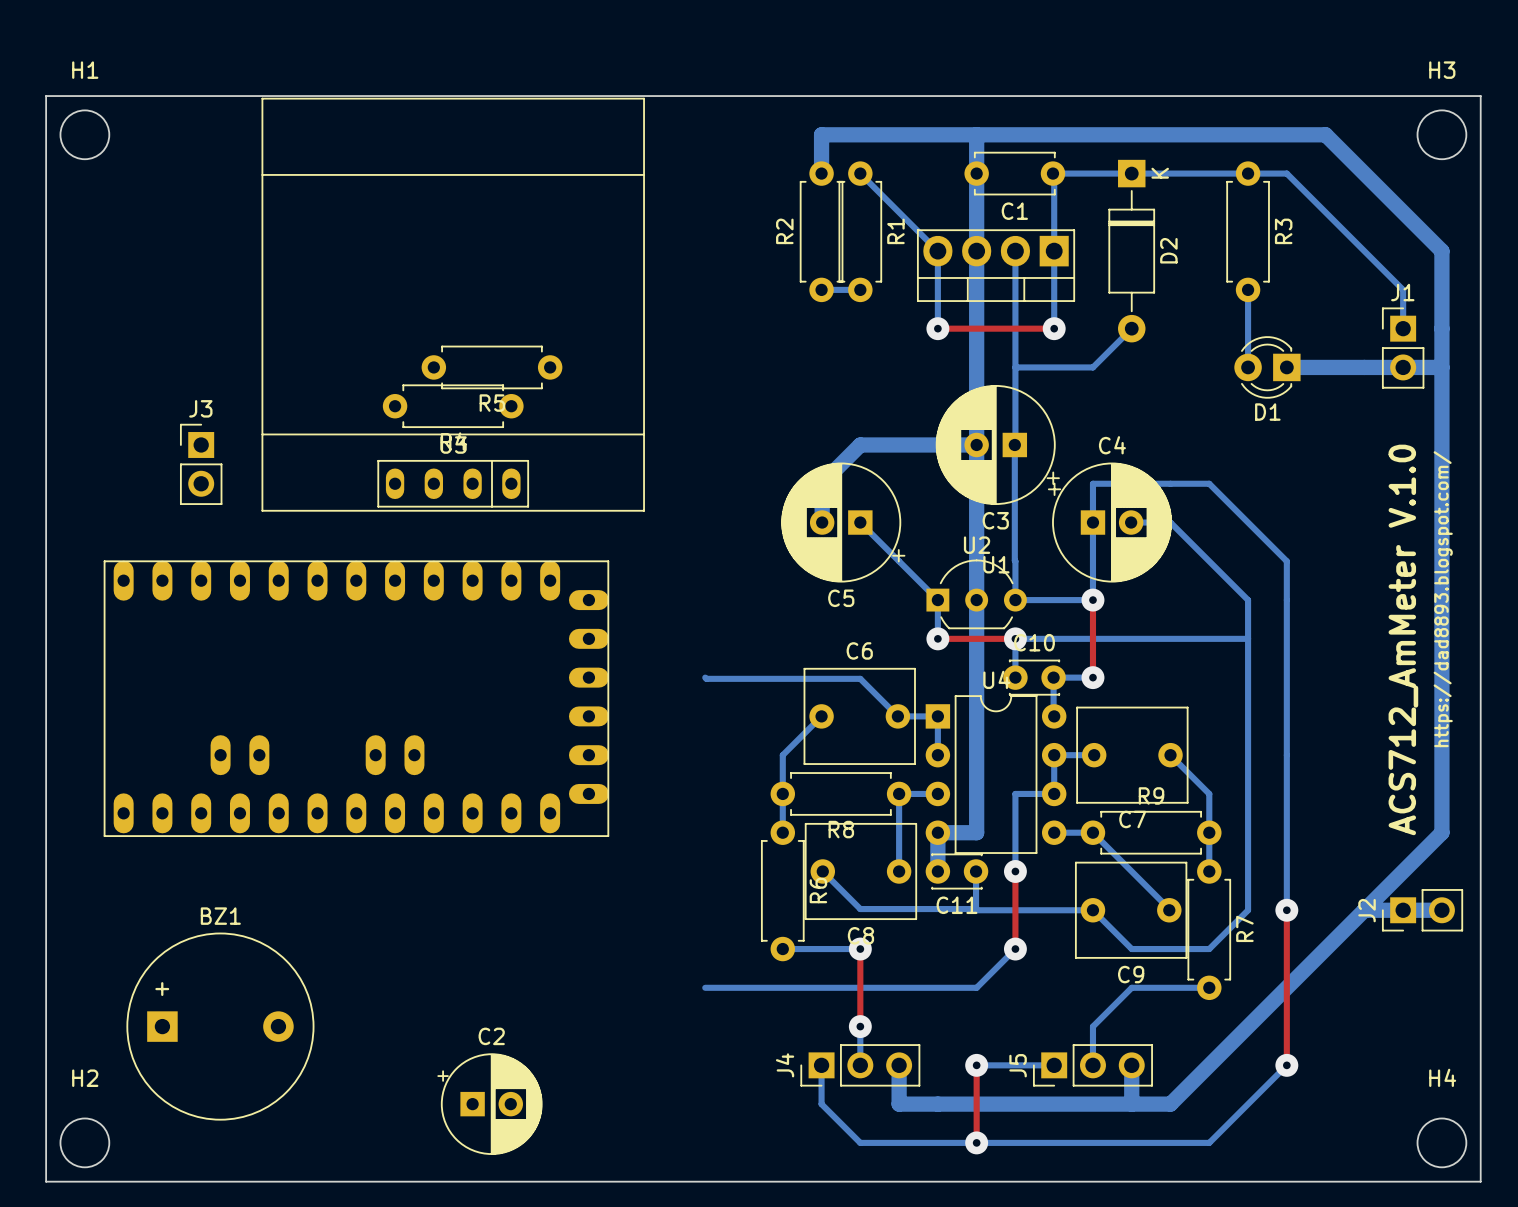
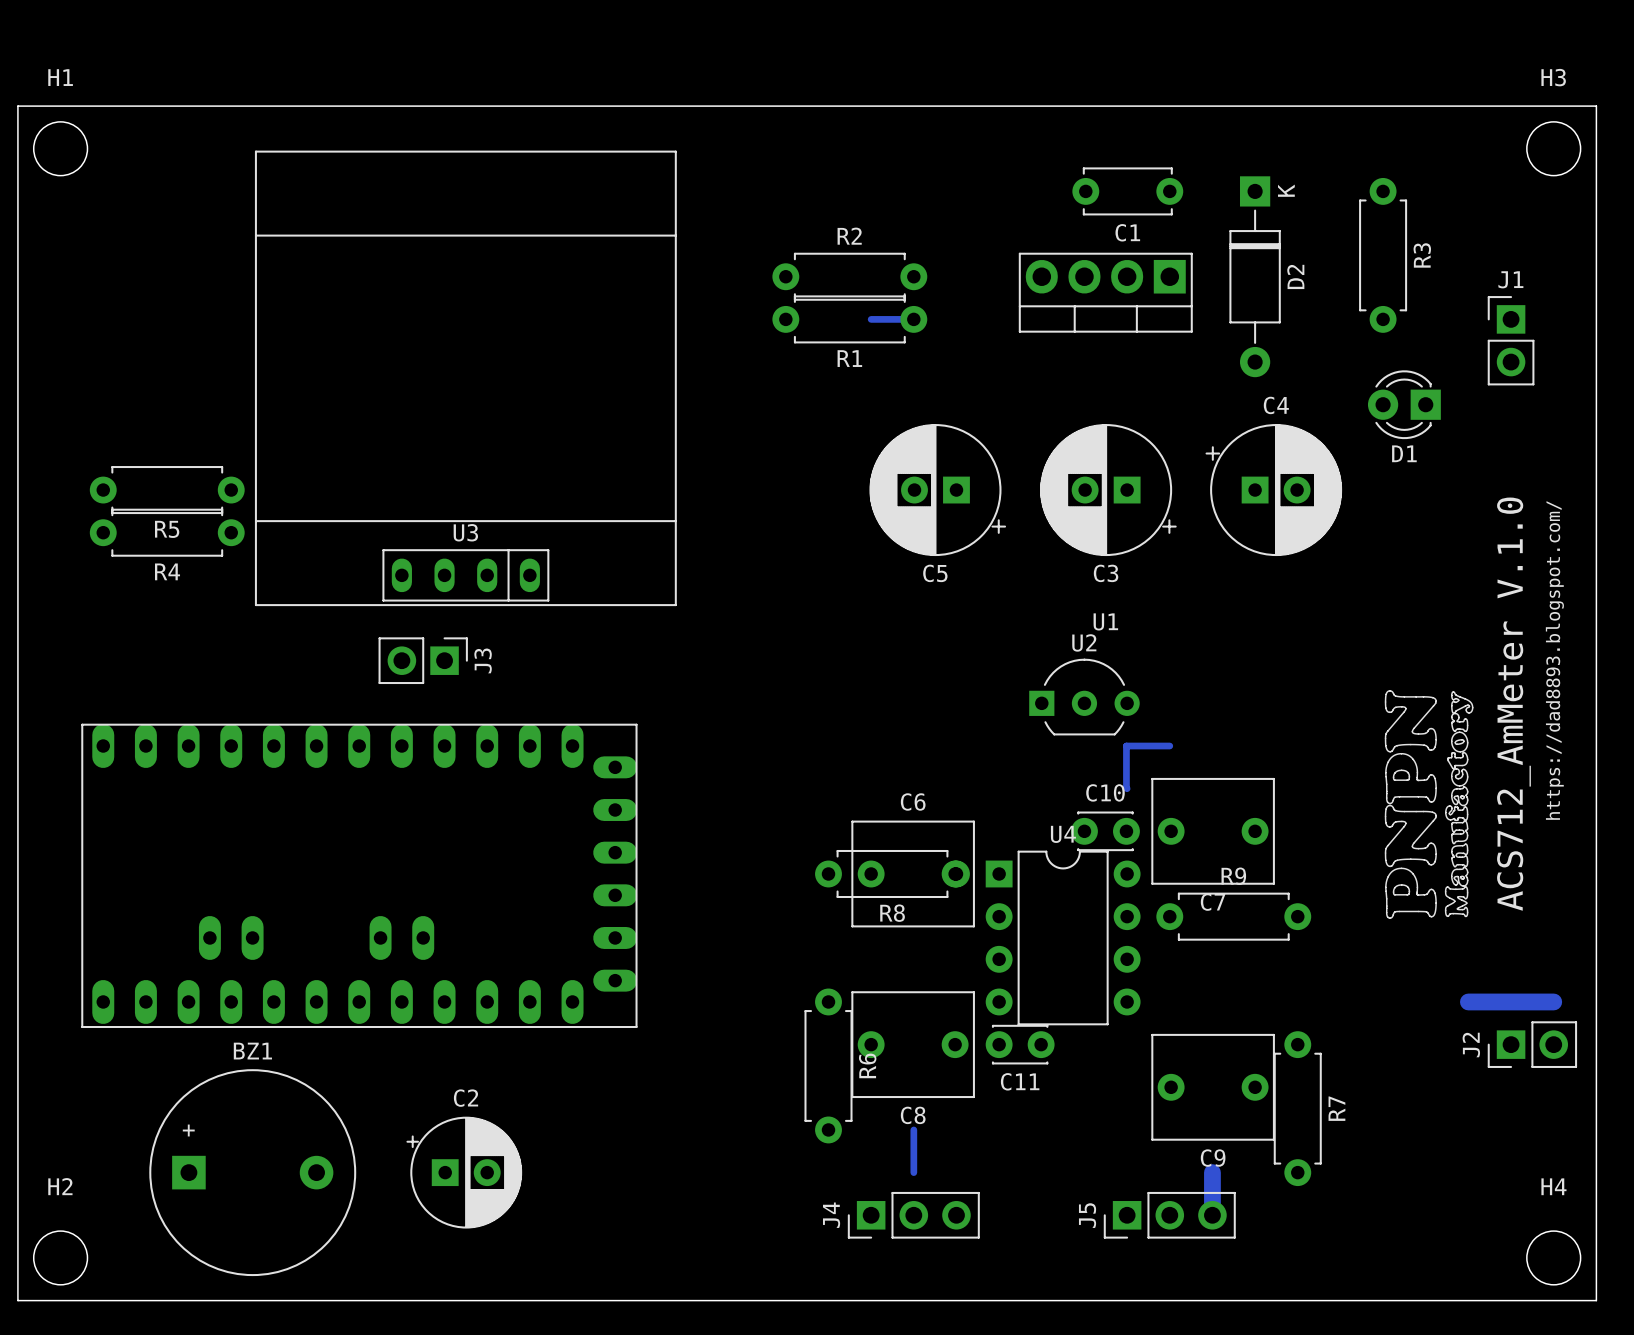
bottom track: (976, 134) (976, 832) (937, 832) (937, 871) -> none
bottom track: (821, 173) (821, 134) (1325, 134) (1441, 251) (1441, 832) (1170, 1104) (899, 1104) (899, 1065) -> none
bottom track: (860, 173) (937, 251) (937, 328) -> none
C1 position: (1014, 173) -> (1127, 191)
R2 rotation: 0° (821, 231) -> 90° clockwise (849, 276)
R1 rotation: 0° (860, 231) -> 90° clockwise (849, 319)
R3 position: (1248, 231) -> (1383, 255)
bottom track: (1015, 251) (1015, 600) (1092, 600) (1092, 483) (1209, 483) (1286, 561) (1286, 910) -> none
D2 position: (1131, 251) -> (1255, 276)
U1 position: (996, 265) -> (1105, 292)
bottom track: (1248, 289) (1248, 367) -> none
U3 position: (453, 304) -> (465, 378)
top track: (937, 328) (1054, 328) -> none
via: (937, 328) -> none
bottom track: (1054, 328) (1052, 173) (1286, 173) (1403, 289) (1403, 328) -> none
via: (1054, 328) -> none
bottom track: (1131, 328) (1092, 367) (1015, 367) -> none
J1 position: (1403, 348) -> (1511, 340)
R5 position: (492, 367) -> (167, 490)
D1 position: (1267, 367) -> (1404, 404)
bottom track: (1286, 367) (1441, 367) -> none
R4 position: (453, 406) -> (167, 532)
bottom track: (976, 444) (860, 444) (821, 483) (822, 522) -> none
C3 position: (997, 444) -> (1108, 490)
J3 rotation: 0° (201, 464) -> 90° clockwise (423, 660)
J3 position: (201, 464) -> (423, 660)
C5 position: (843, 522) -> (937, 490)
bottom track: (860, 522) (937, 600) (937, 638) -> none
C4 position: (1109, 522) -> (1273, 490)
bottom track: (1131, 522) (1170, 522) (1248, 600) (1248, 910) (1209, 949) (1131, 949) (1092, 910) (975, 909) -> none
U2 position: (976, 594) -> (1084, 697)
top track: (1092, 600) (1092, 677) -> none
via: (1092, 600) -> none
line: none -> (1390, 690) (1397, 696) (1428, 697) (1435, 699) (1435, 703) (1412, 731) (1414, 733) (1423, 733) (1429, 728) (1433, 729) (1436, 739) (1433, 749) (1429, 749) (1424, 745) (1408, 744) (1396, 746) (1390, 751) (1387, 750) (1386, 733) (1405, 708) (1397, 707) (1391, 712) (1387, 711) (1385, 695) (1390, 690)
line: none -> (1453, 691) (1452, 698) (1458, 700) (1452, 702) (1452, 712) (1467, 705) (1469, 706) (1466, 711) (1471, 712) (1472, 707) (1470, 702) (1453, 691)
top track: (937, 638) (1015, 638) -> none
via: (937, 638) -> none
via: (1015, 638) -> none
bottom track: (1248, 638) (1015, 638) (1015, 677) -> none
line: none -> (1455, 713) (1451, 716) (1454, 721) (1451, 722) (1453, 729) (1461, 729) (1466, 731) (1466, 719) (1457, 721) (1458, 716) (1455, 713)
line: none -> (1459, 732) (1464, 735) (1467, 742) (1465, 749) (1460, 751) (1453, 748) (1451, 741) (1453, 735) (1459, 732)
line: none -> (1461, 739) (1456, 741) (1455, 743) (1462, 742) (1463, 740) (1461, 739)
bottom track: (705, 677) (860, 678) (897, 716) (937, 716) (937, 755) -> none
C10 position: (1034, 677) -> (1105, 831)
via: (1092, 677) -> none
line: none -> (1463, 752) (1467, 757) (1466, 763) (1455, 765) (1454, 768) (1452, 768) (1448, 757) (1451, 757) (1452, 752) (1454, 753) (1455, 757) (1461, 757) (1463, 752)
line: none -> (1401, 753) (1408, 755) (1414, 761) (1417, 780) (1426, 779) (1431, 774) (1434, 776) (1436, 791) (1433, 801) (1430, 801) (1426, 797) (1398, 796) (1394, 797) (1391, 803) (1387, 802) (1386, 765) (1392, 756) (1401, 753)
part position: (356, 698) -> (359, 875)
line: none -> (1456, 768) (1459, 771) (1455, 776) (1457, 778) (1462, 776) (1462, 769) (1467, 773) (1467, 780) (1462, 785) (1456, 785) (1452, 780) (1452, 772) (1456, 768)
line: none -> (1401, 770) (1394, 773) (1394, 779) (1408, 779) (1408, 772) (1401, 770)
line: none -> (1464, 786) (1452, 791) (1452, 798) (1455, 804) (1457, 803) (1454, 797) (1456, 796) (1461, 804) (1466, 803) (1467, 790) (1464, 786)
bottom track: (821, 716) (782, 755) (782, 832) -> none
C6 position: (859, 716) -> (913, 873)
line: none -> (1462, 795) (1464, 796) (1463, 798) (1460, 797) (1462, 795)
line: none -> (1390, 805) (1385, 810) (1387, 825) (1391, 826) (1397, 821) (1405, 823) (1386, 848) (1387, 864) (1390, 866) (1396, 860) (1408, 859) (1424, 859) (1429, 864) (1433, 864) (1436, 854) (1433, 843) (1429, 843) (1423, 848) (1414, 848) (1412, 846) (1435, 818) (1435, 813) (1428, 811) (1397, 811) (1390, 805)
line: none -> (1449, 805) (1445, 810) (1447, 818) (1457, 820) (1459, 817) (1466, 819) (1466, 807) (1459, 810) (1454, 807) (1450, 814) (1452, 808) (1449, 805)
line: none -> (1464, 820) (1452, 823) (1453, 831) (1461, 830) (1463, 832) (1452, 834) (1453, 843) (1466, 839) (1467, 826) (1464, 820)
bottom track: (1094, 755) (1054, 755) (1054, 793) (1015, 793) (1015, 871) -> none
bottom track: (1170, 755) (1209, 793) (1209, 871) -> none
line: none -> (1465, 844) (1466, 854) (1459, 853) (1456, 855) (1458, 857) (1466, 856) (1466, 865) (1457, 864) (1454, 866) (1451, 858) (1454, 856) (1452, 848) (1465, 844)
U4 position: (996, 774) -> (1063, 937)
line: none -> (1464, 867) (1467, 871) (1466, 883) (1461, 885) (1456, 876) (1454, 878) (1457, 883) (1455, 884) (1452, 879) (1452, 872) (1464, 867)
line: none -> (1401, 868) (1408, 870) (1414, 876) (1417, 894) (1426, 894) (1431, 889) (1434, 891) (1436, 906) (1433, 916) (1430, 916) (1426, 911) (1398, 911) (1394, 912) (1391, 917) (1387, 916) (1386, 880) (1392, 871) (1401, 868)
bottom track: (937, 793) (899, 793) (899, 871) -> none
line: none -> (1462, 876) (1460, 878) (1463, 878) (1464, 877) (1462, 876)
line: none -> (1401, 884) (1394, 887) (1394, 894) (1408, 894) (1408, 887) (1401, 884)
line: none -> (1465, 886) (1467, 890) (1466, 898) (1457, 897) (1466, 903) (1457, 908) (1466, 907) (1467, 915) (1452, 913) (1447, 916) (1446, 907) (1454, 901) (1446, 895) (1446, 887) (1456, 889) (1465, 886)
bottom track: (1054, 832) (1092, 832) (1169, 910) -> none
bottom track: (822, 871) (860, 909) (975, 909) -> none
C8 position: (860, 871) -> (913, 1044)
C11 position: (956, 871) -> (1020, 1044)
bottom track: (976, 871) (975, 909) -> none
top track: (1015, 871) (1015, 949) -> none
via: (1015, 871) -> none
R6 position: (782, 890) -> (828, 1065)
C9 position: (1131, 910) -> (1213, 1087)
top track: (1286, 910) (1286, 1065) -> none
via: (1286, 910) -> none
J2 position: (1422, 910) -> (1532, 1044)
R7 position: (1209, 929) -> (1297, 1108)
bottom track: (782, 949) (860, 949) -> none
top track: (860, 949) (860, 1026) -> none
via: (860, 949) -> none
bottom track: (1015, 949) (976, 987) (705, 987) -> none
via: (1015, 949) -> none
bottom track: (1209, 987) (1131, 987) (1092, 1026) (1092, 1065) -> none
BZ1 position: (220, 1026) -> (252, 1172)
via: (860, 1026) -> none
bottom track: (821, 1065) (821, 1104) (860, 1142) (1209, 1142) (1286, 1065) -> none
J4 position: (860, 1065) -> (913, 1215)
bottom track: (976, 1065) (1054, 1065) -> none
top track: (976, 1065) (976, 1142) -> none
via: (976, 1065) -> none
J5 position: (1092, 1065) -> (1169, 1215)
via: (1286, 1065) -> none
C2 position: (489, 1104) -> (464, 1172)
via: (976, 1142) -> none

